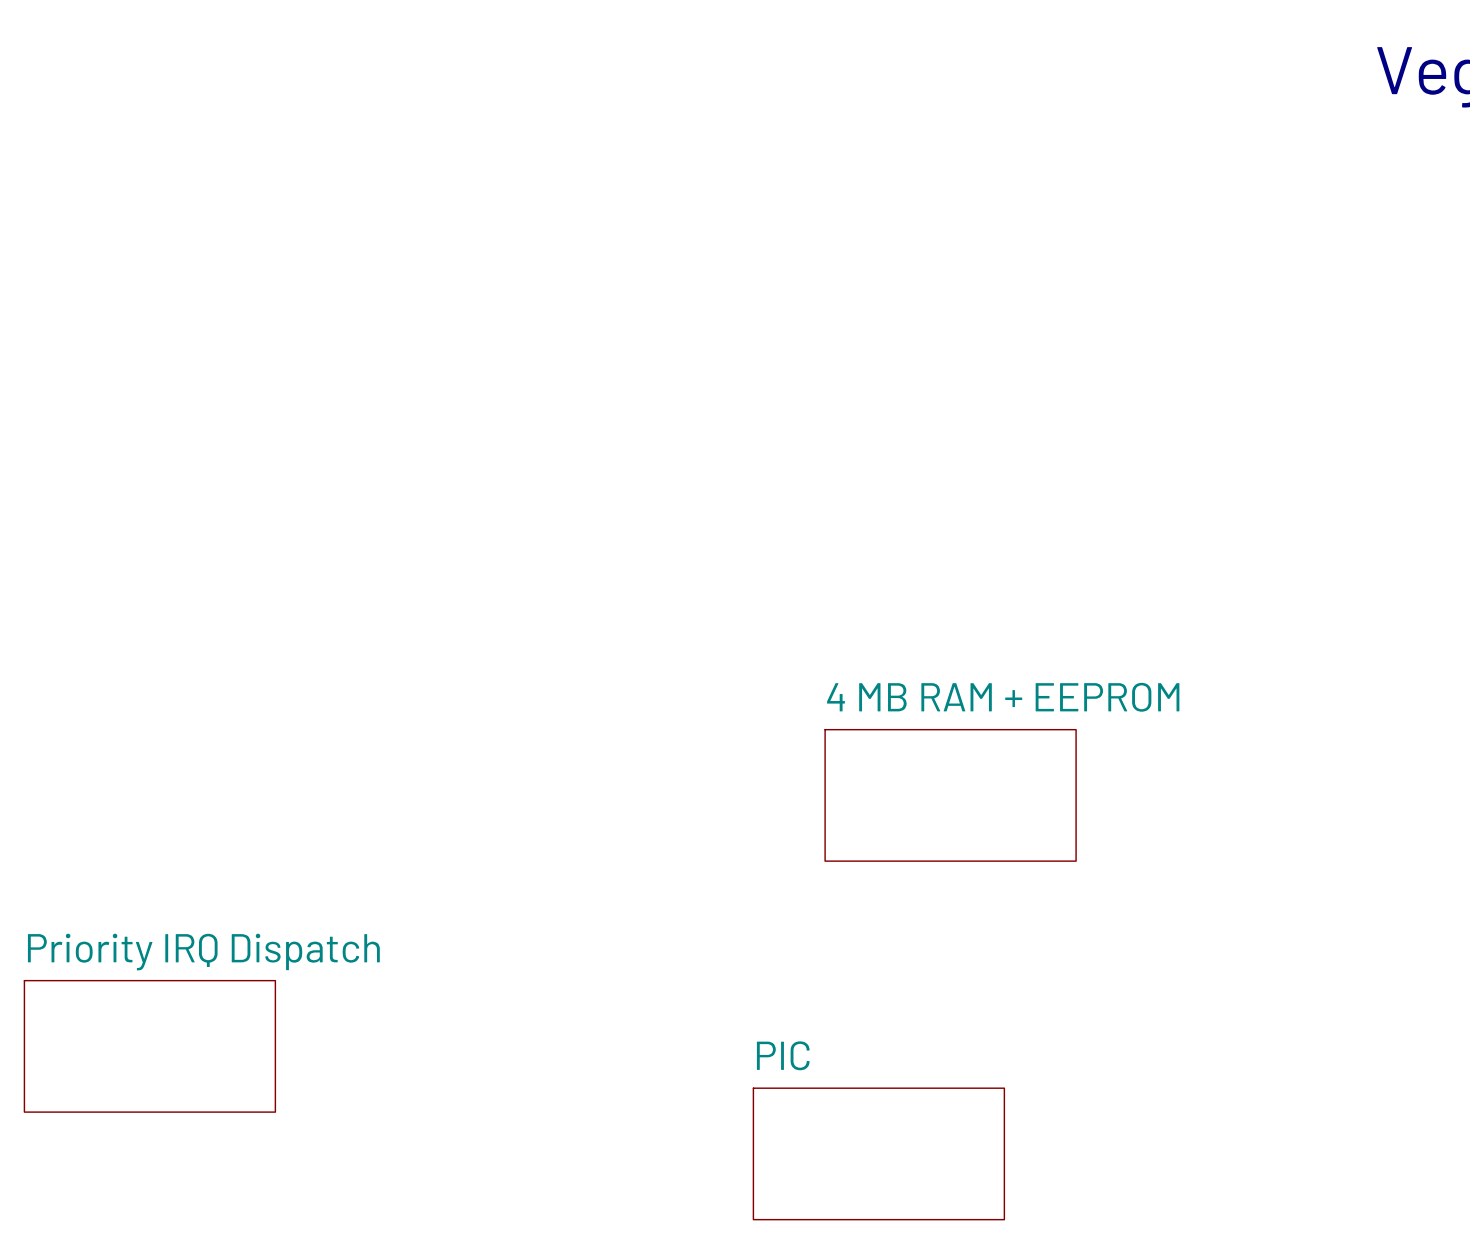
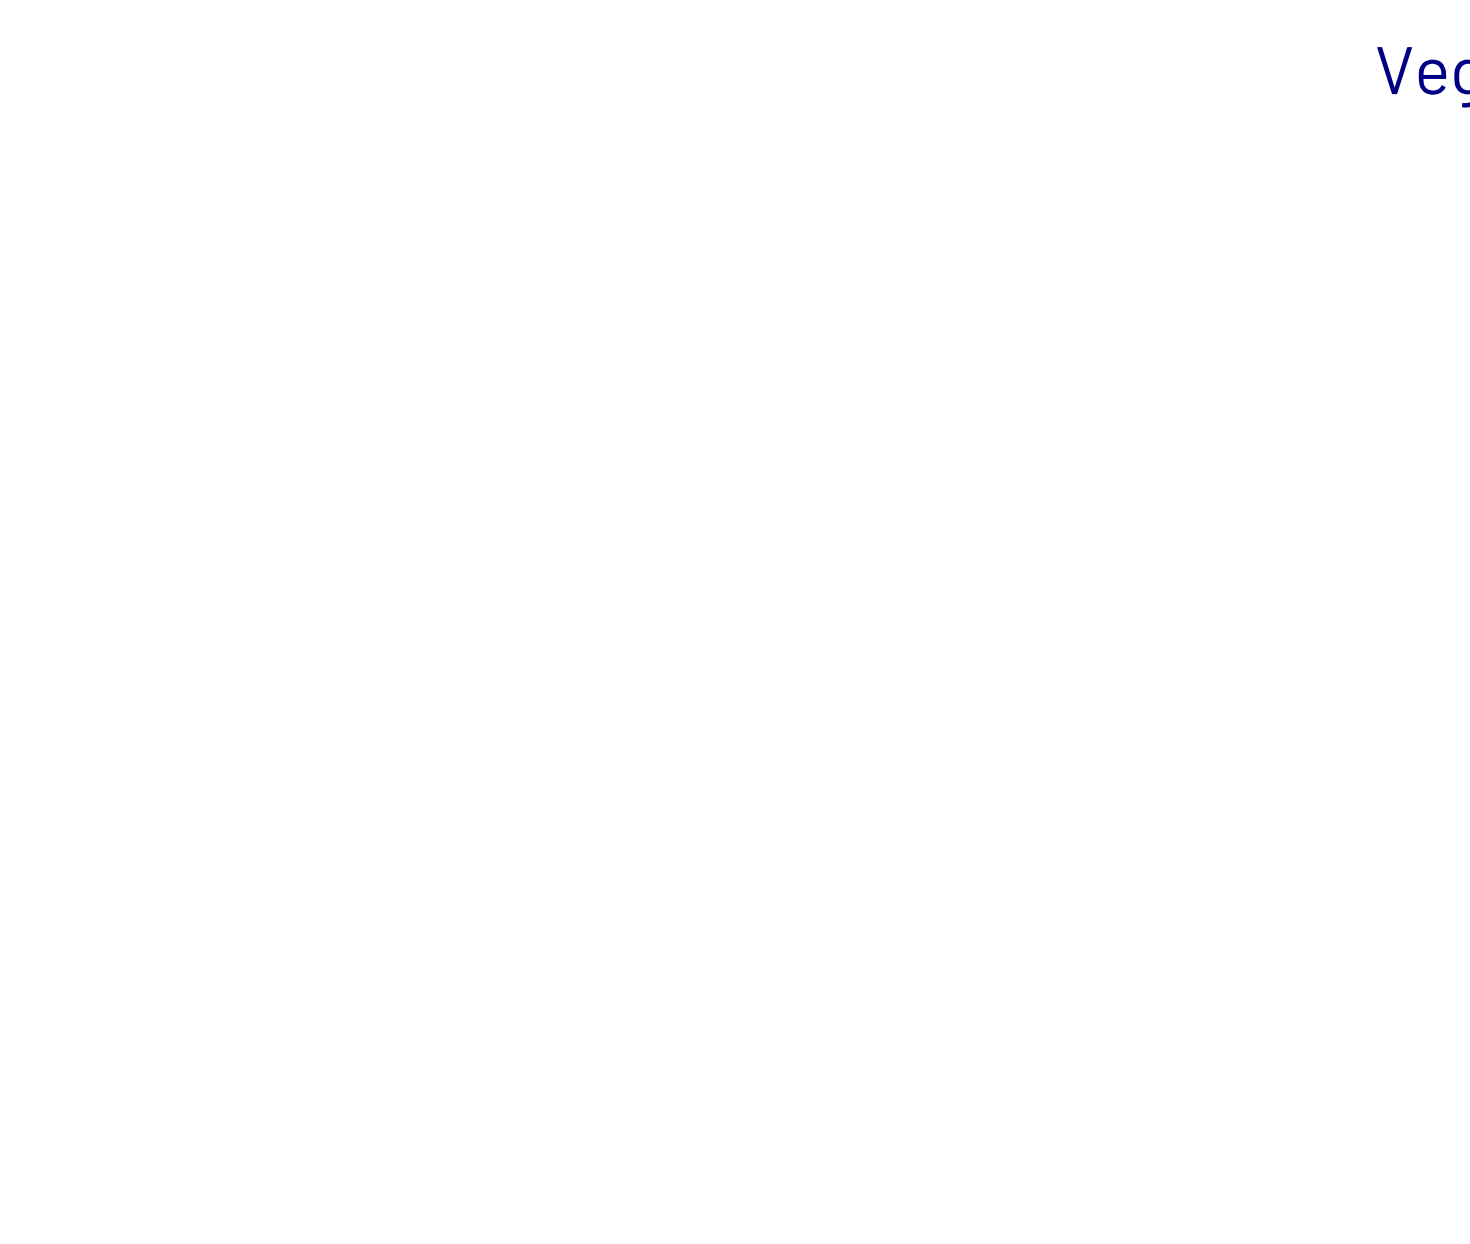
sheet 4 MB RAM + EEPROM: (950, 795) -> none
sheet Priority IRQ Dispatch: (149, 1046) -> none
sheet PIC: (878, 1153) -> none

